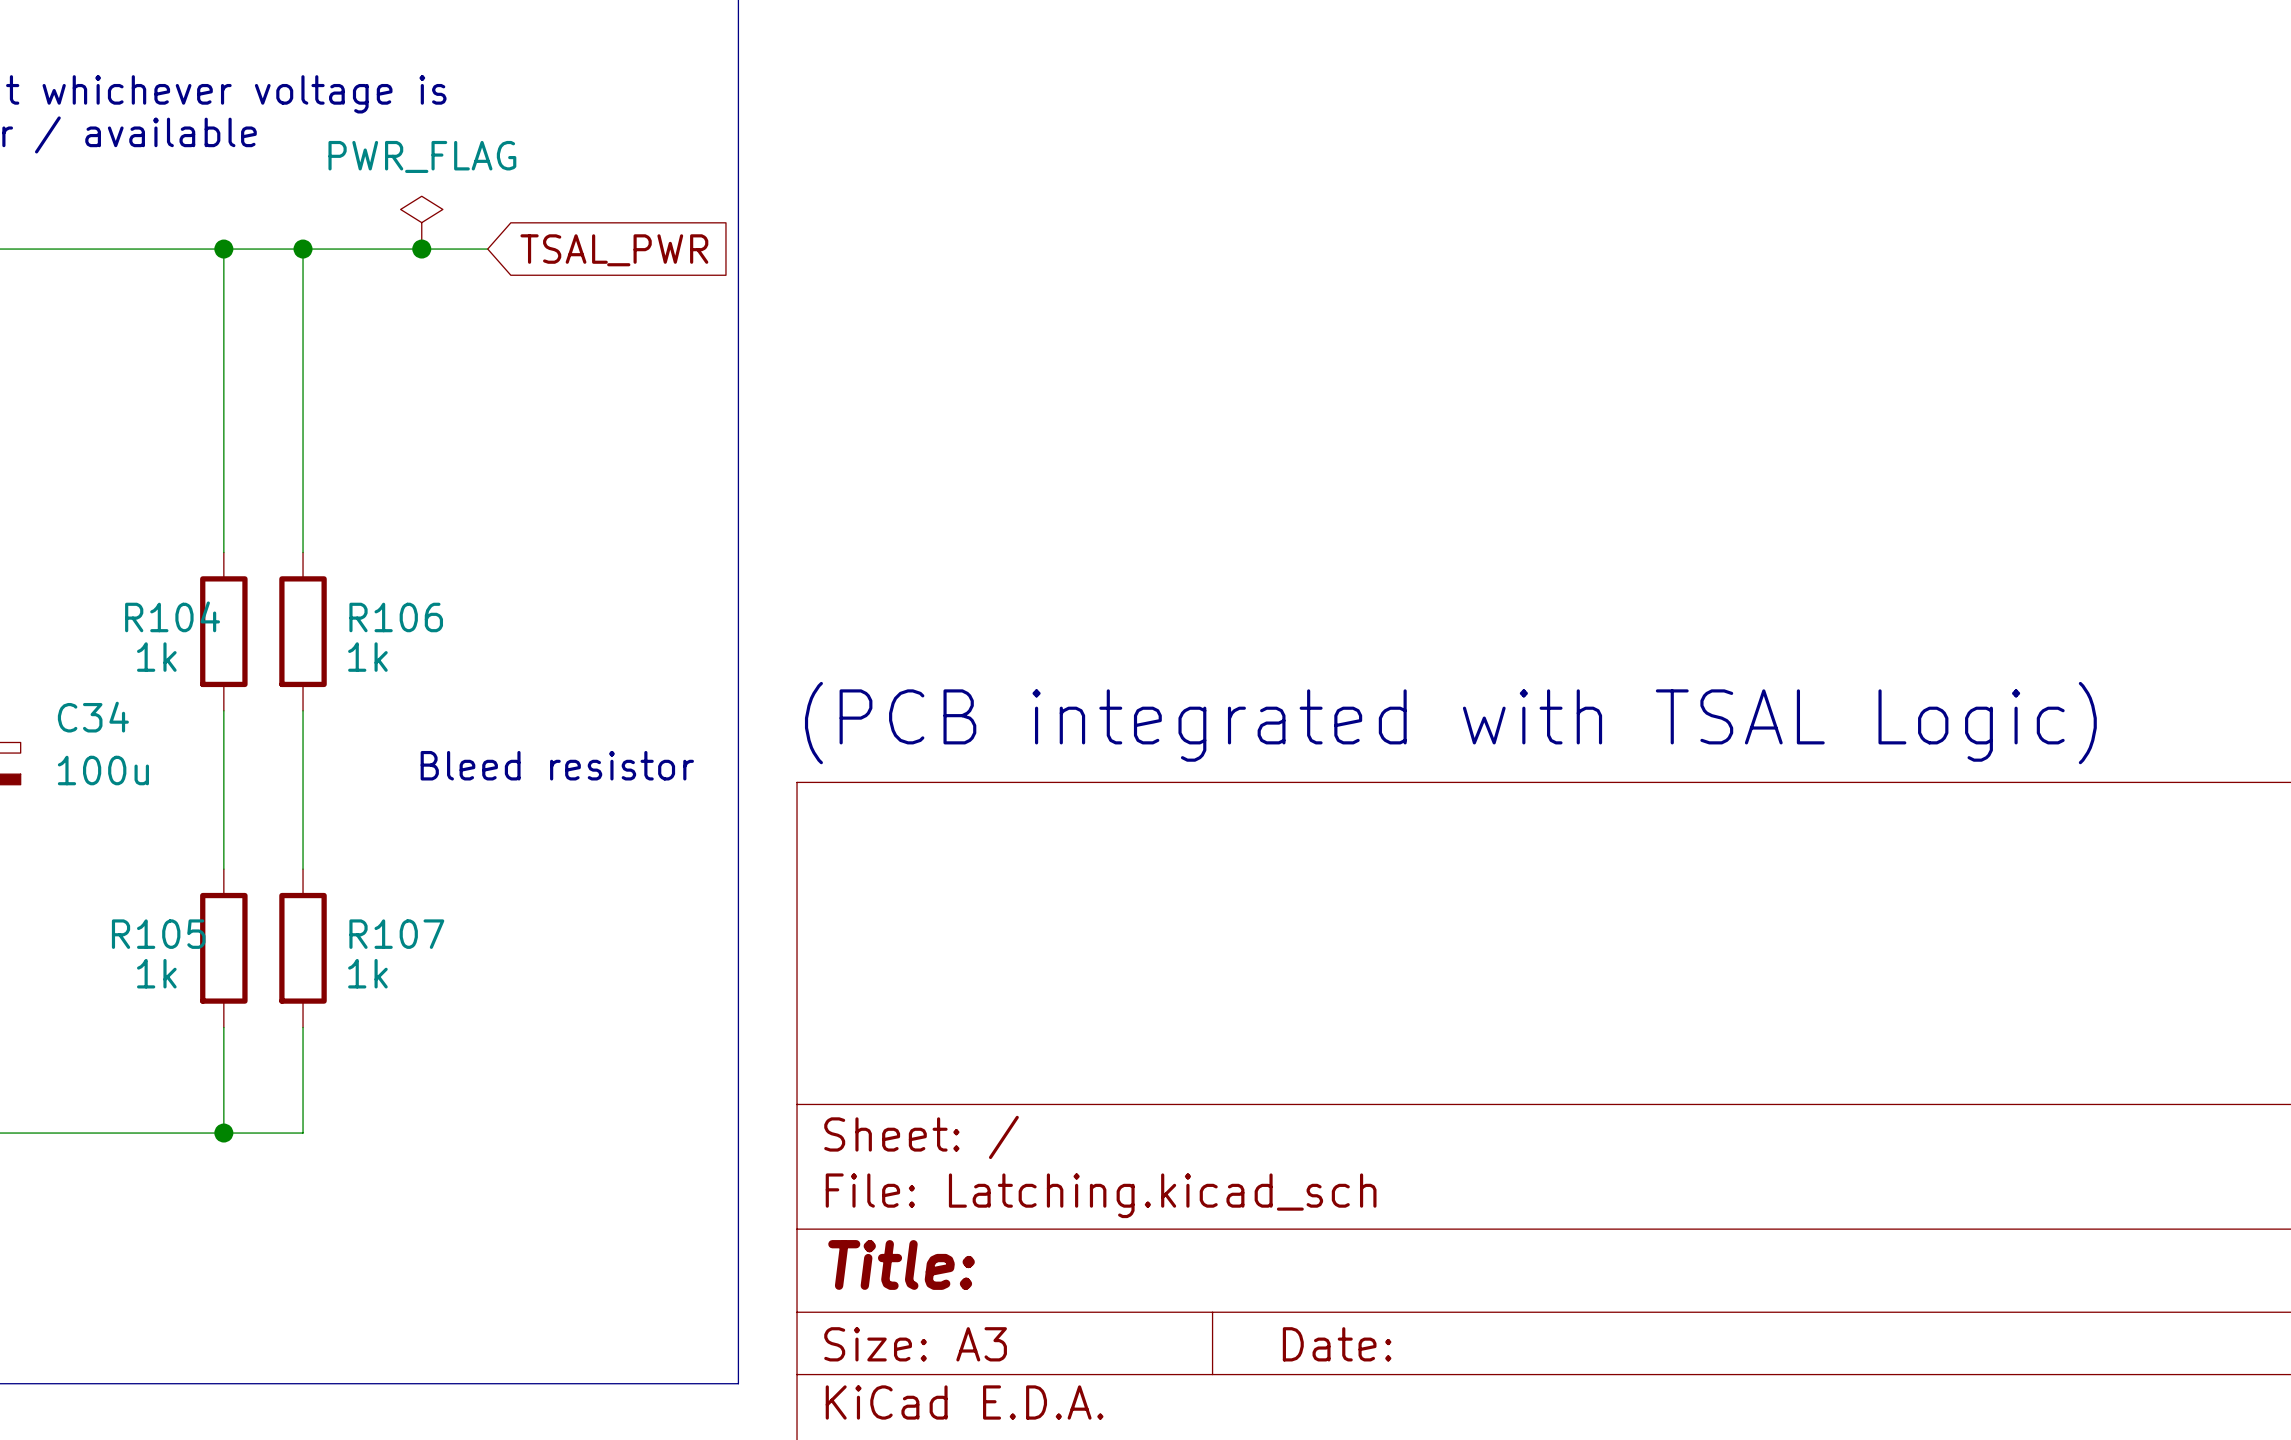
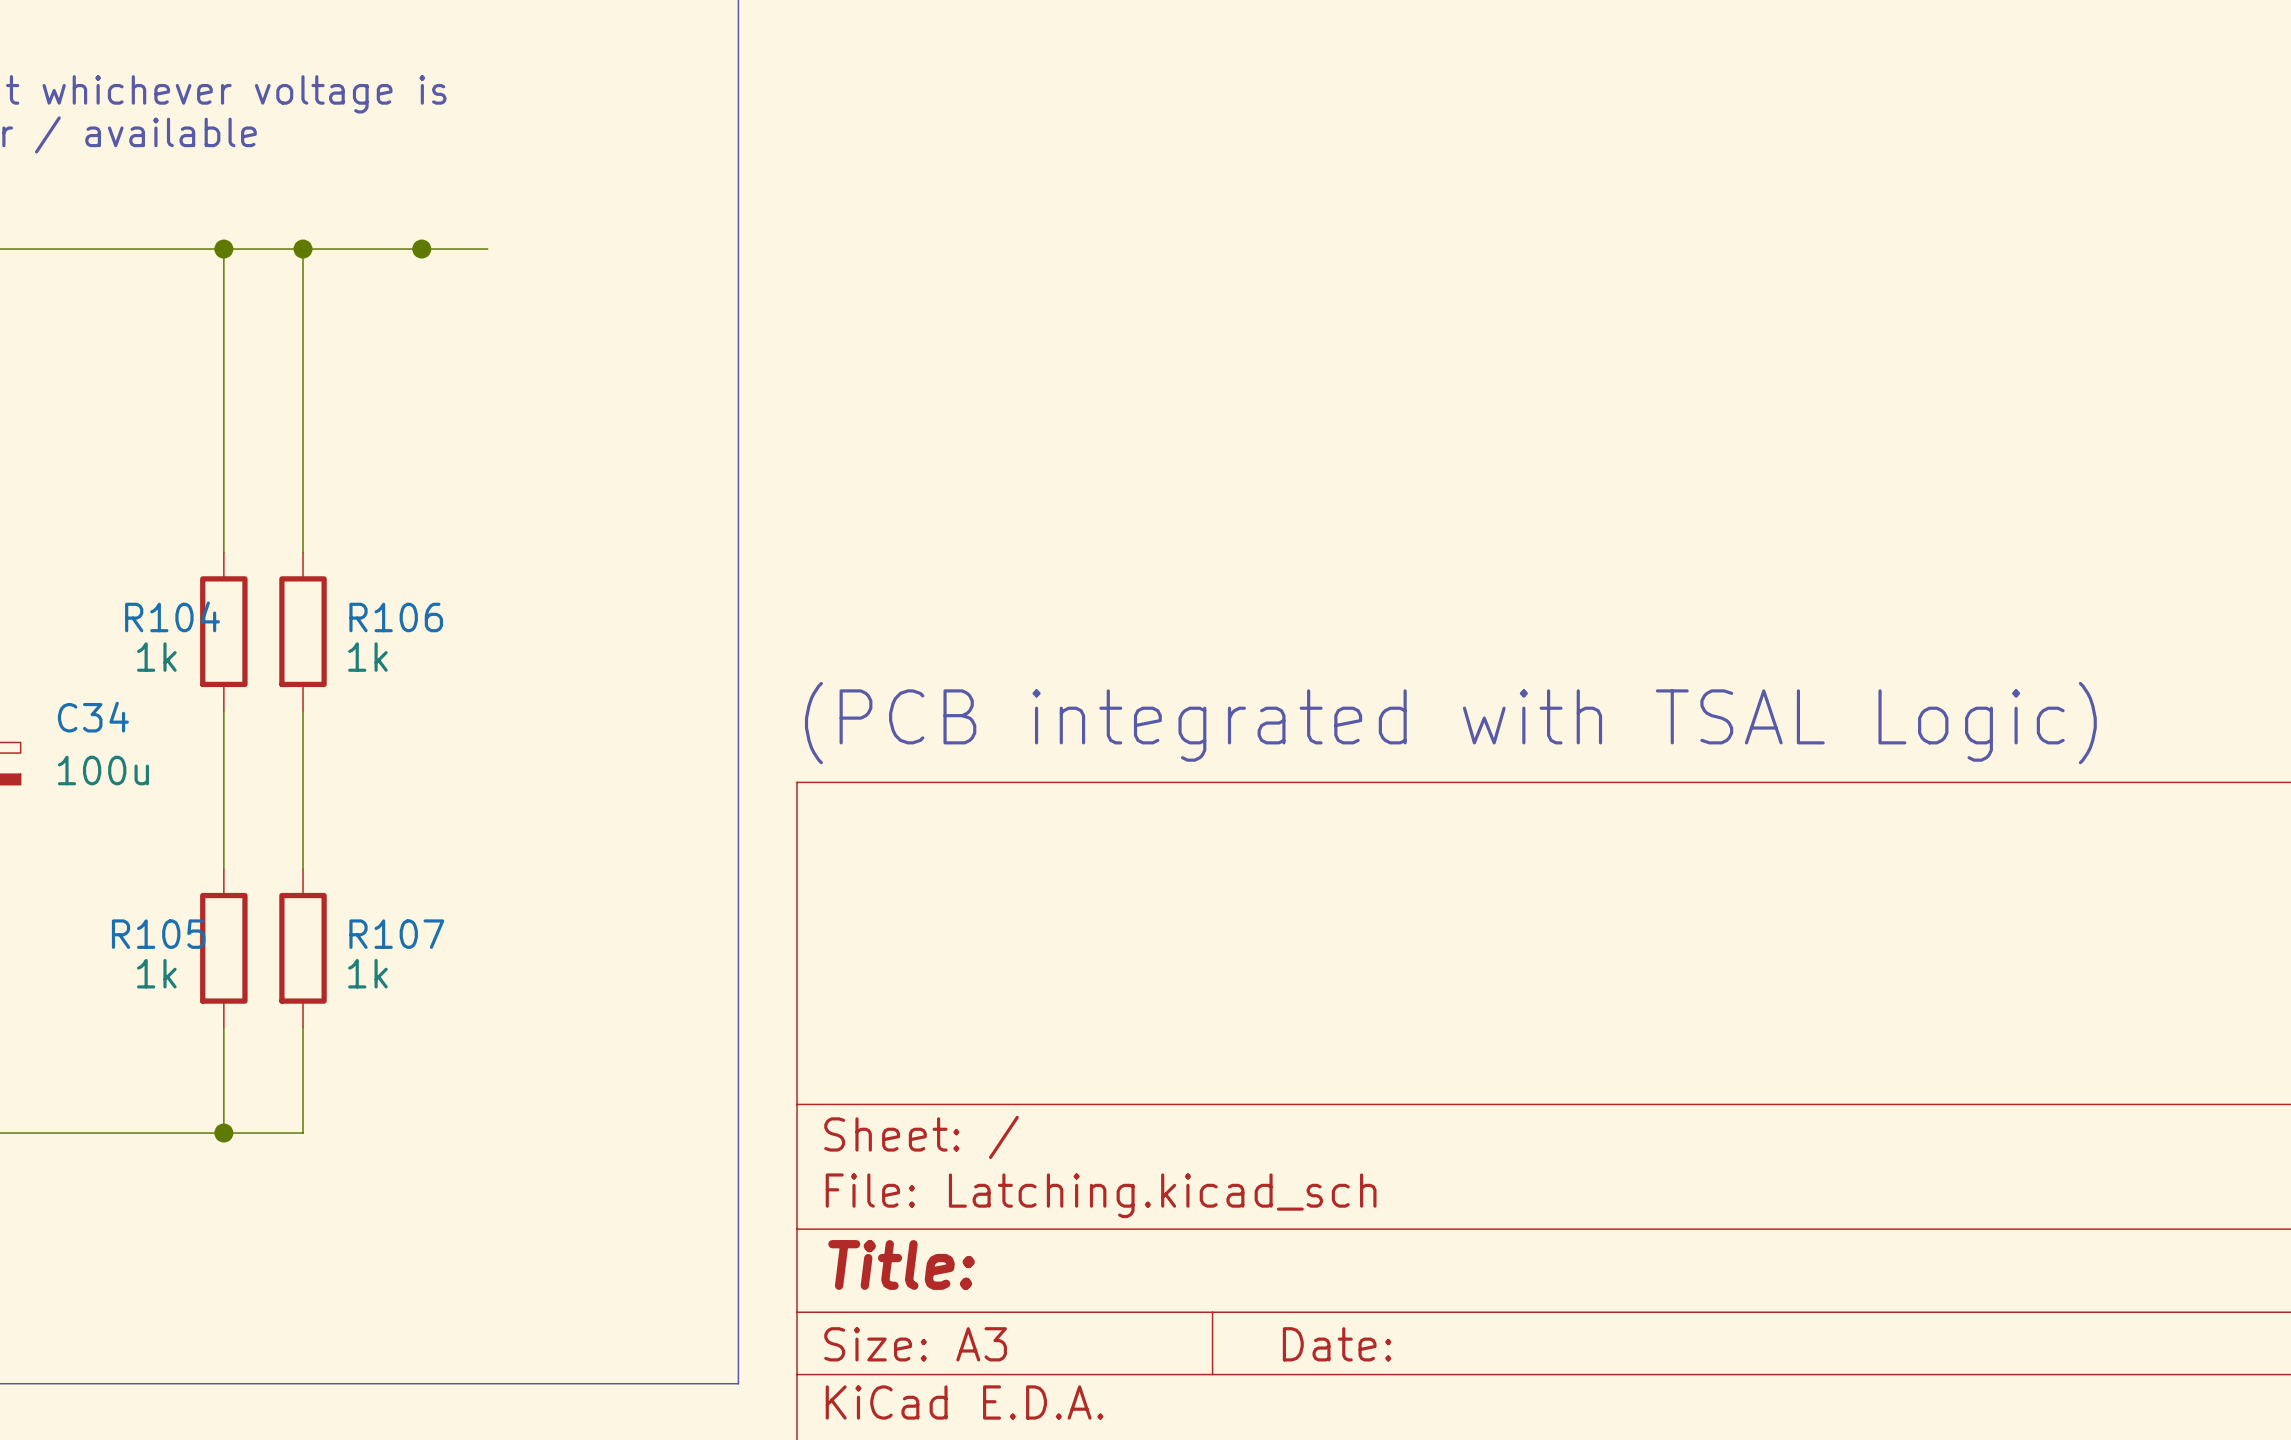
power symbol: PWR_FLAG (421, 222) -> none
global label: TSAL_PWR (614, 250) -> none
text: Bleed resistor (557, 765) -> none

